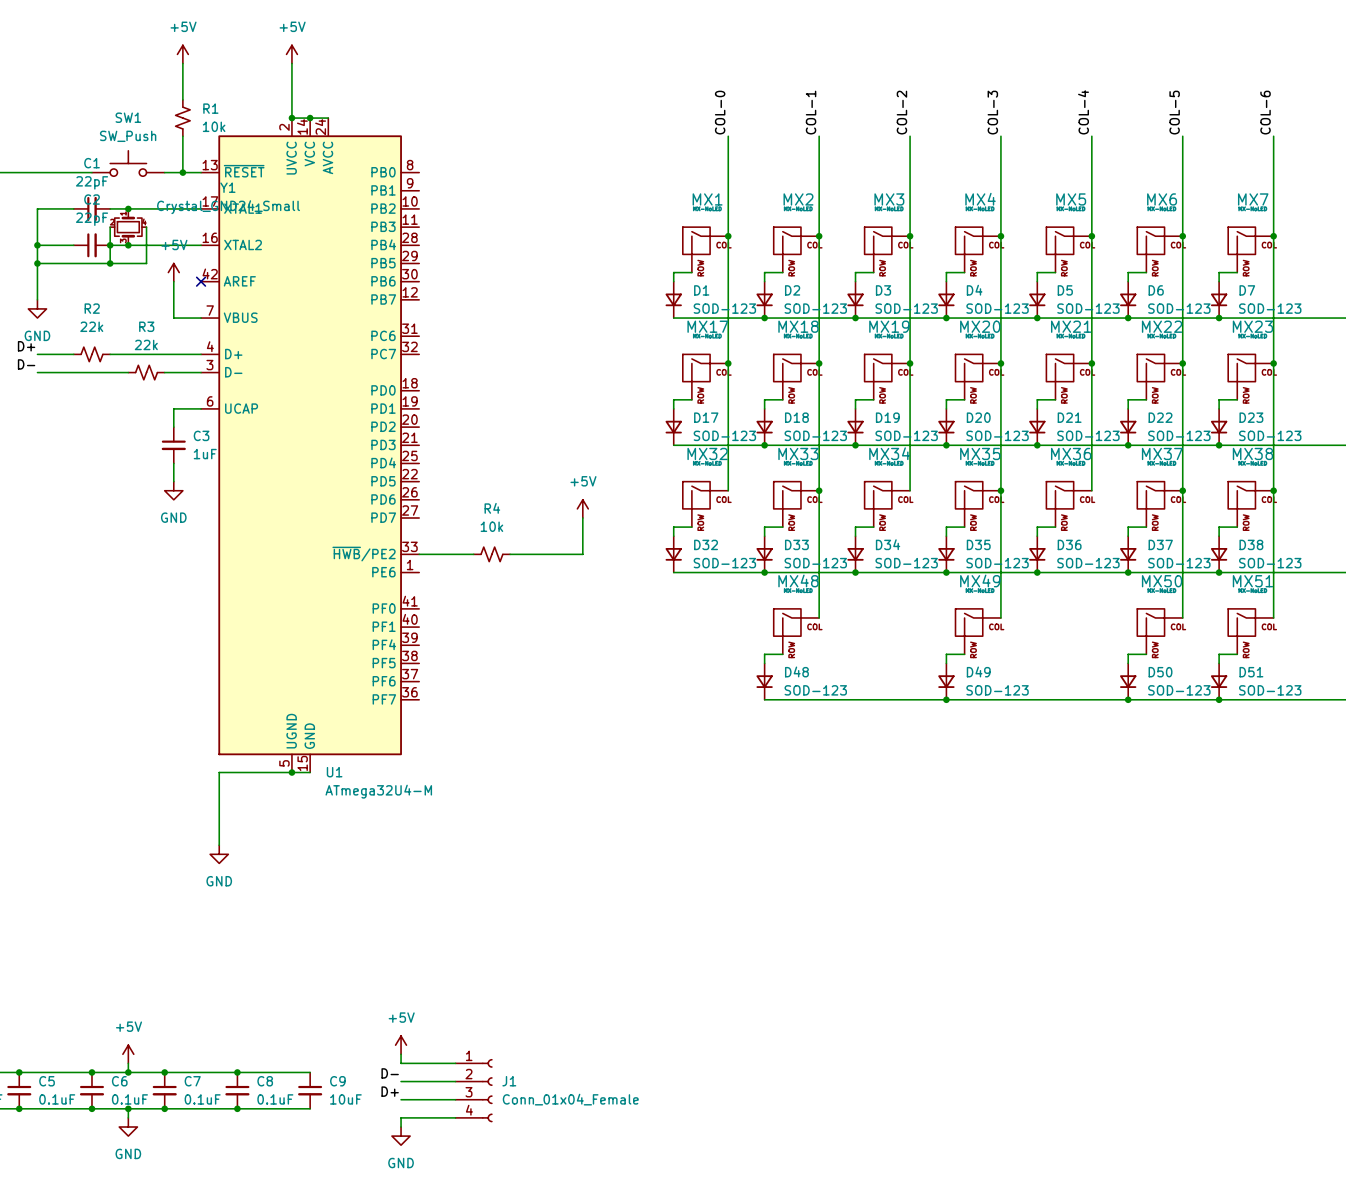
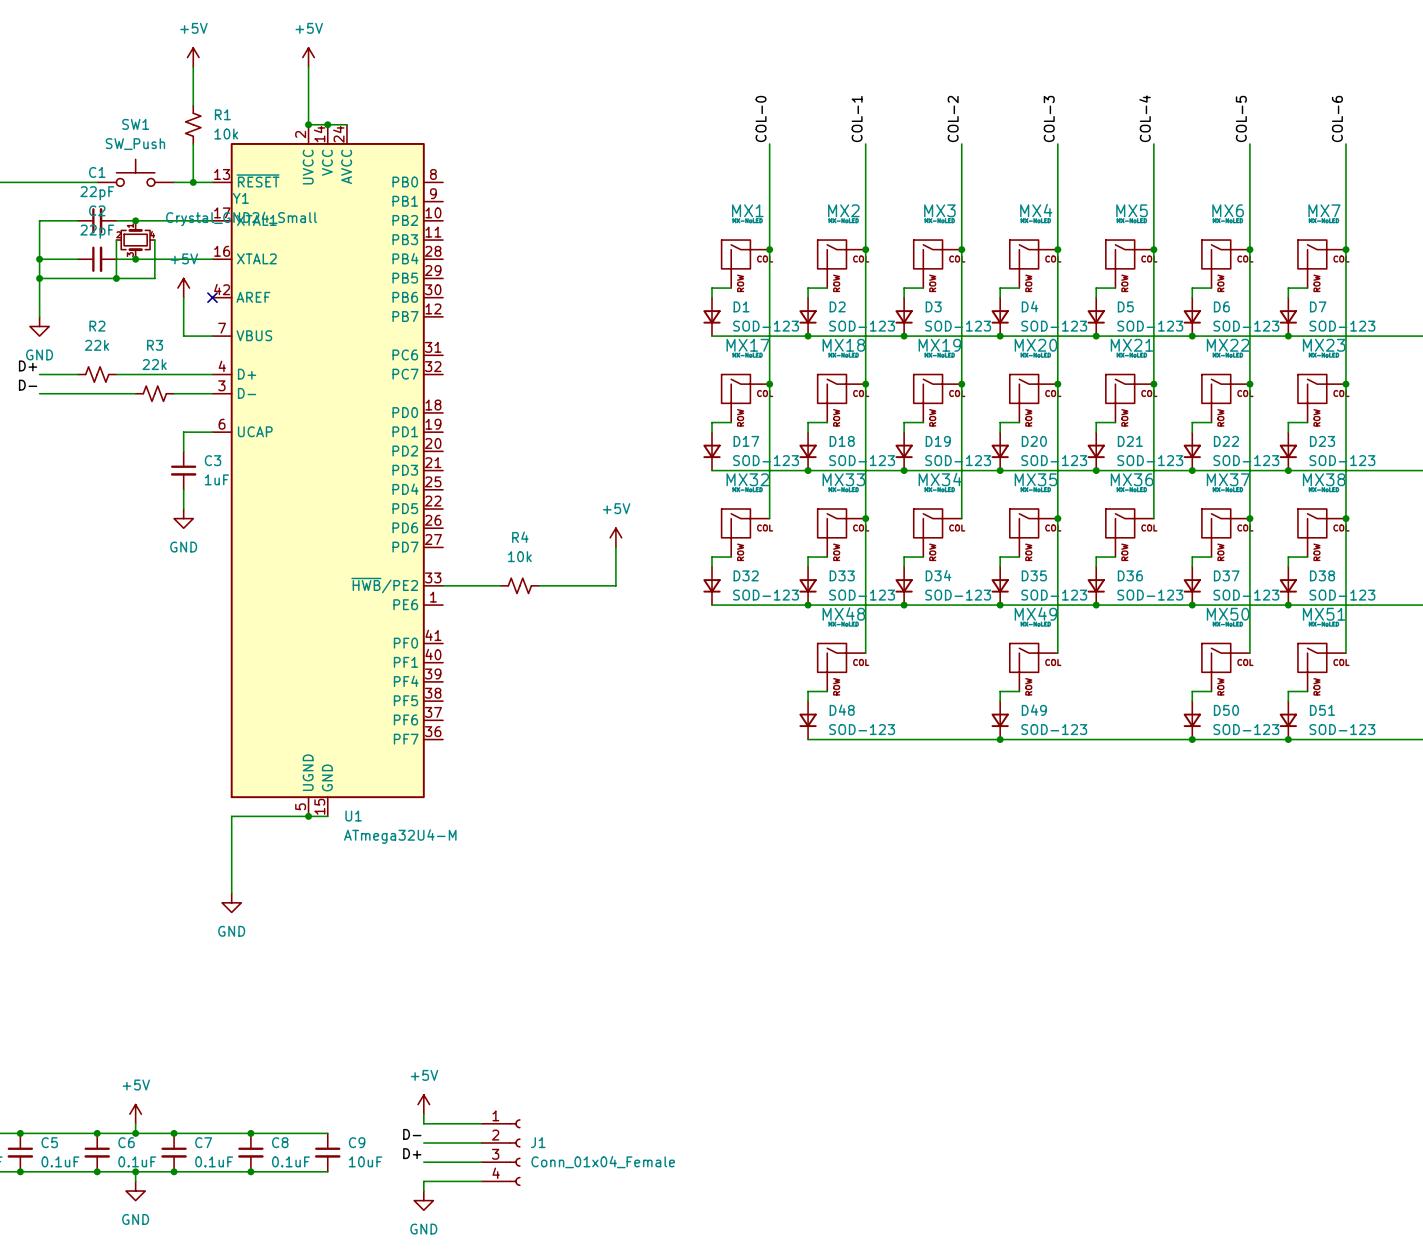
junction: (110, 245) -> none

